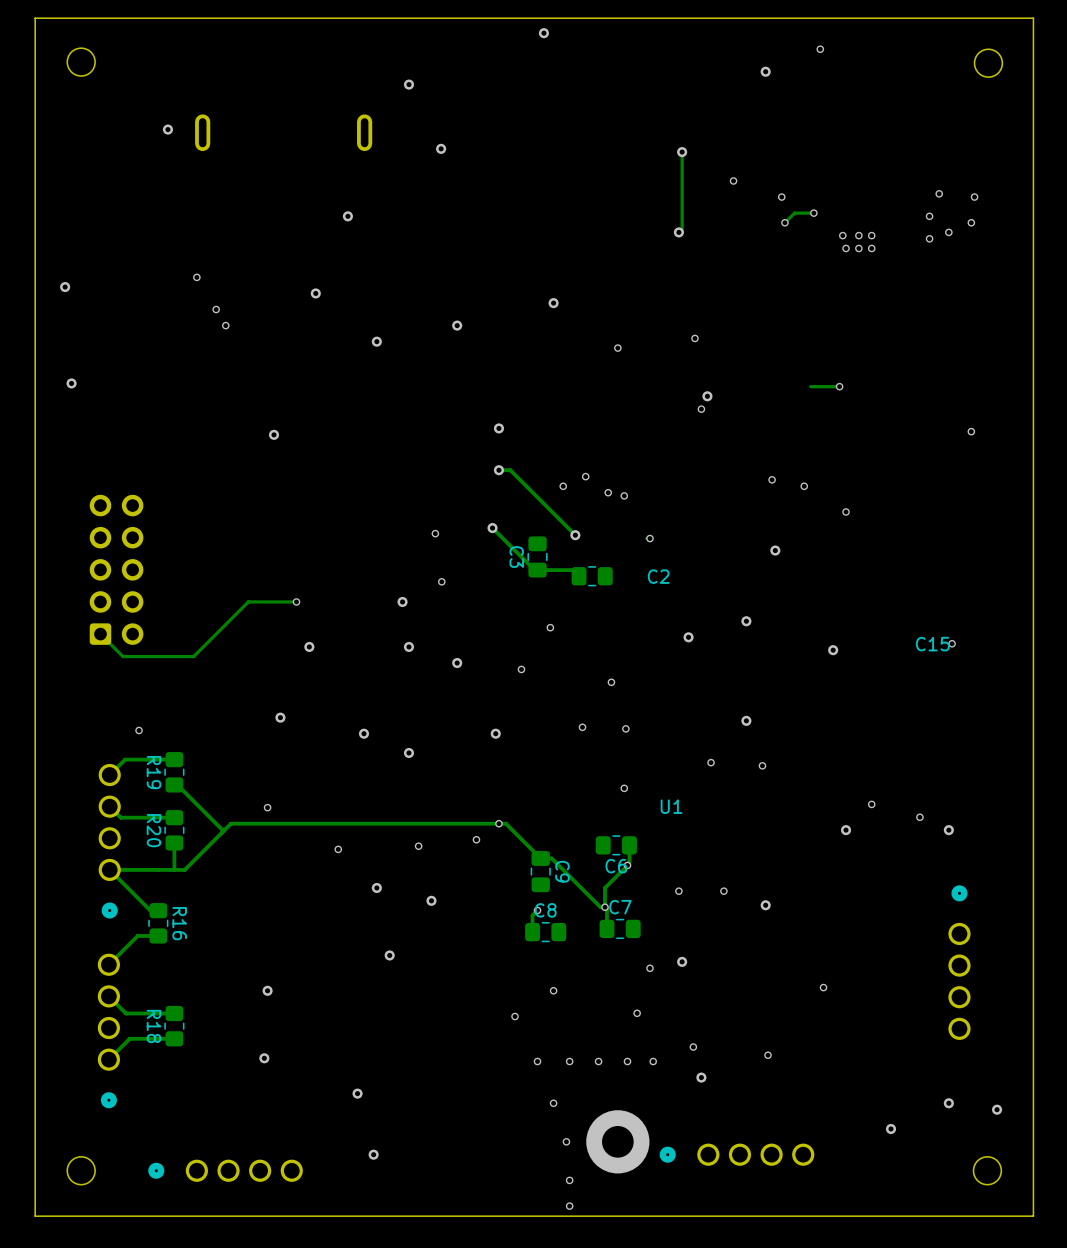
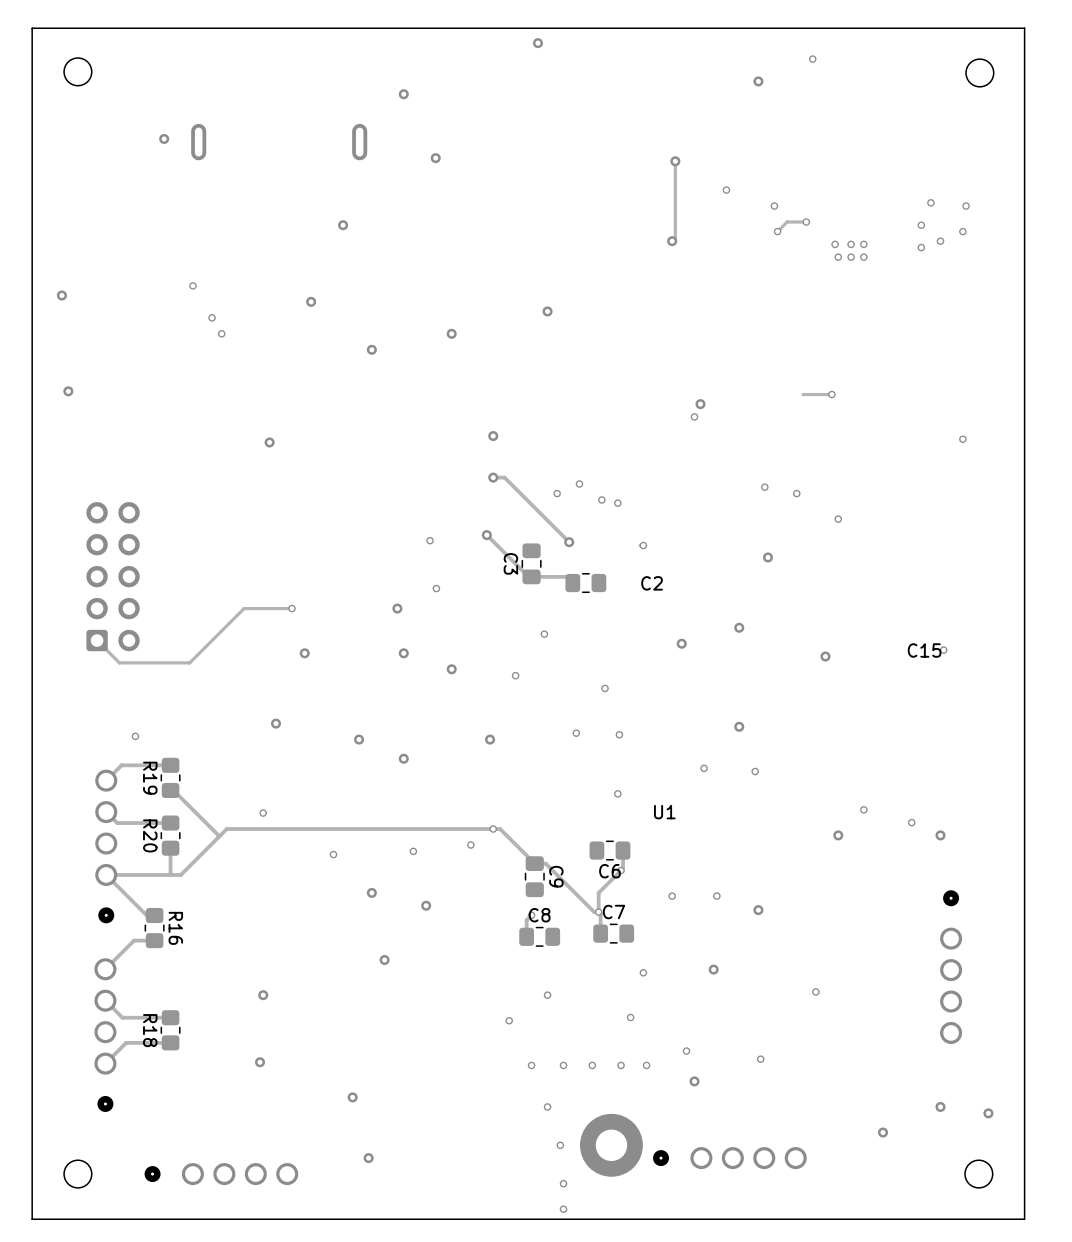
via: (694, 338) -> none
via: (617, 348) -> none
via position: (682, 961) -> (713, 969)

